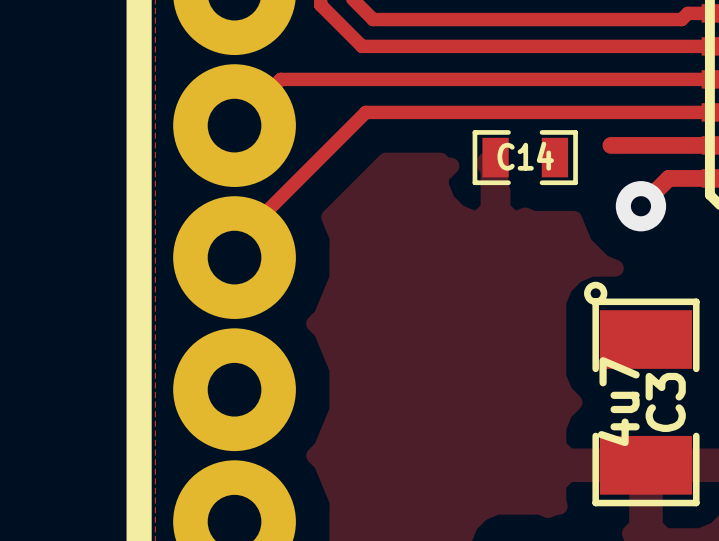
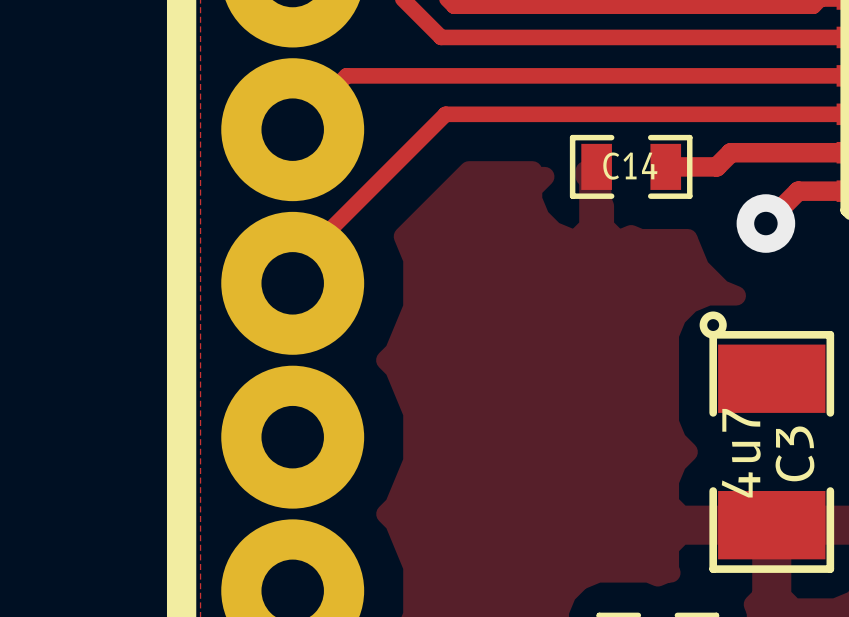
track: none -> (730, 152) (716, 166) (665, 166)

